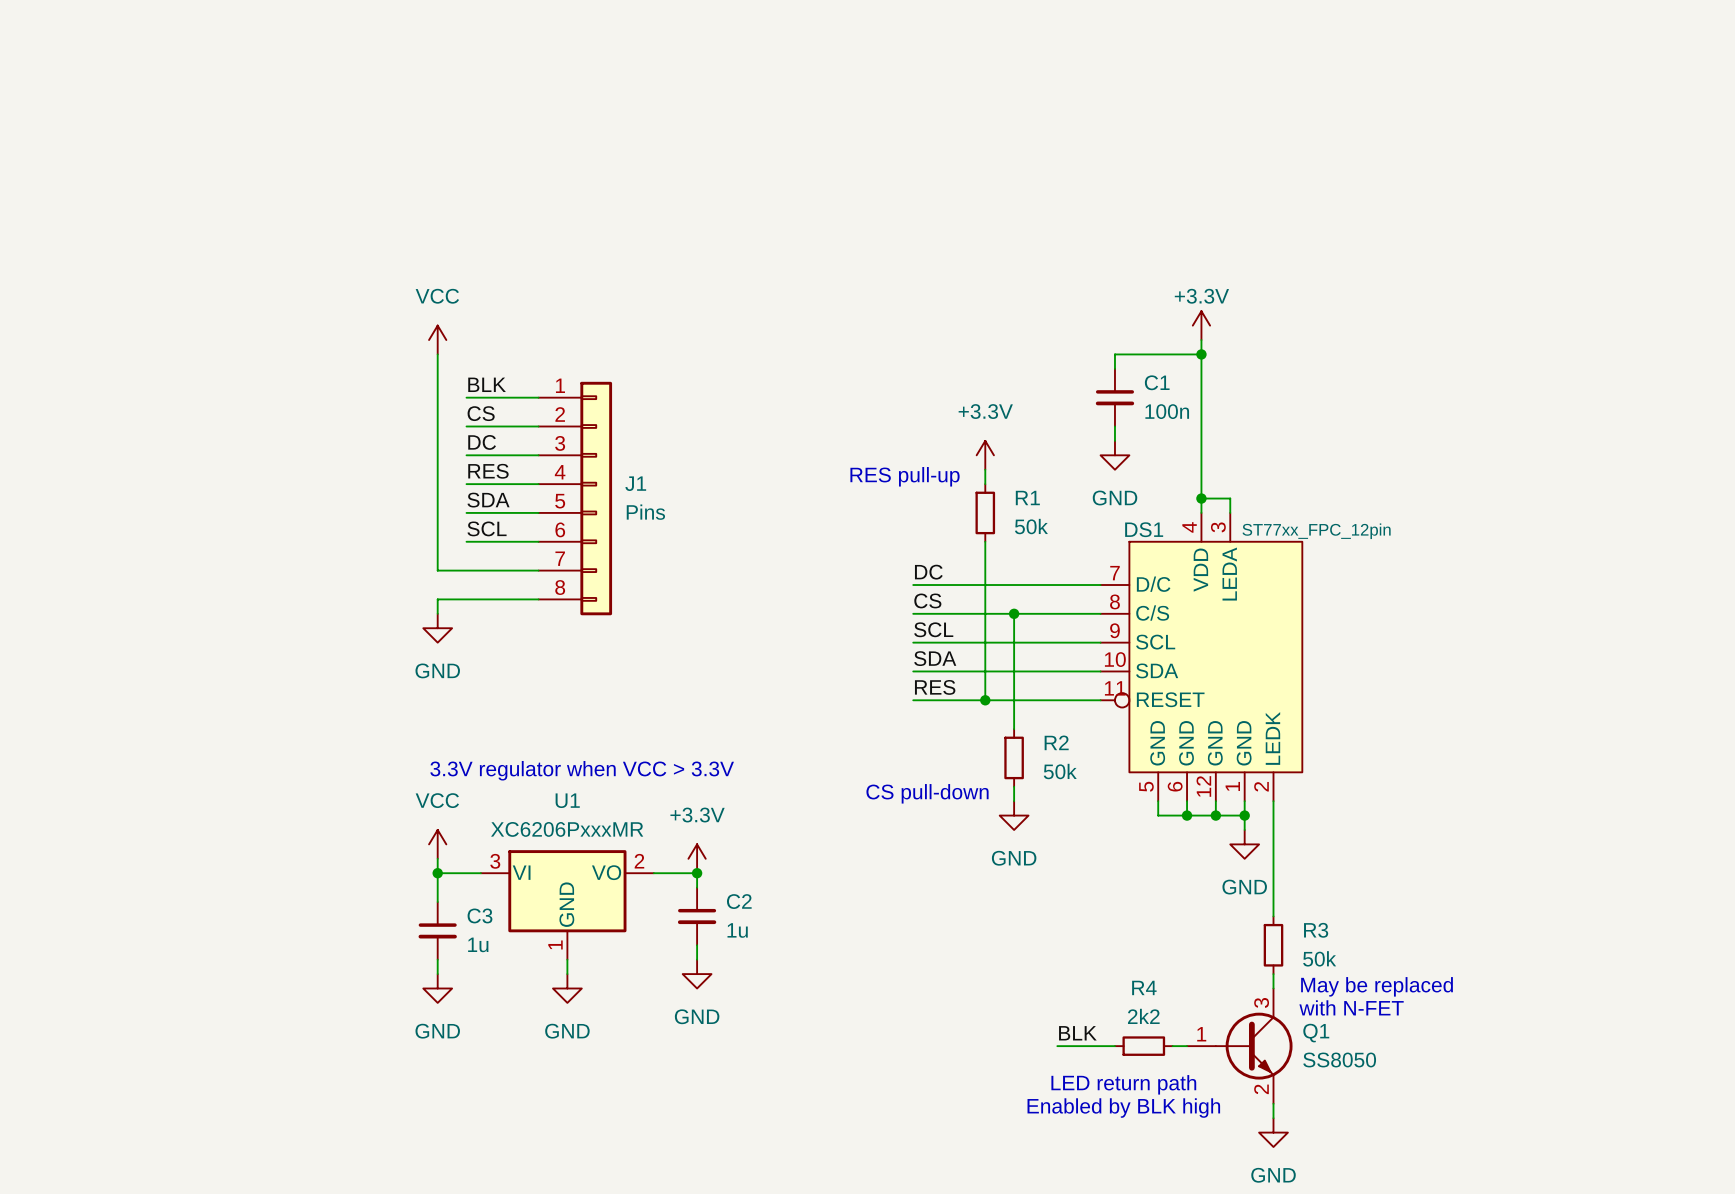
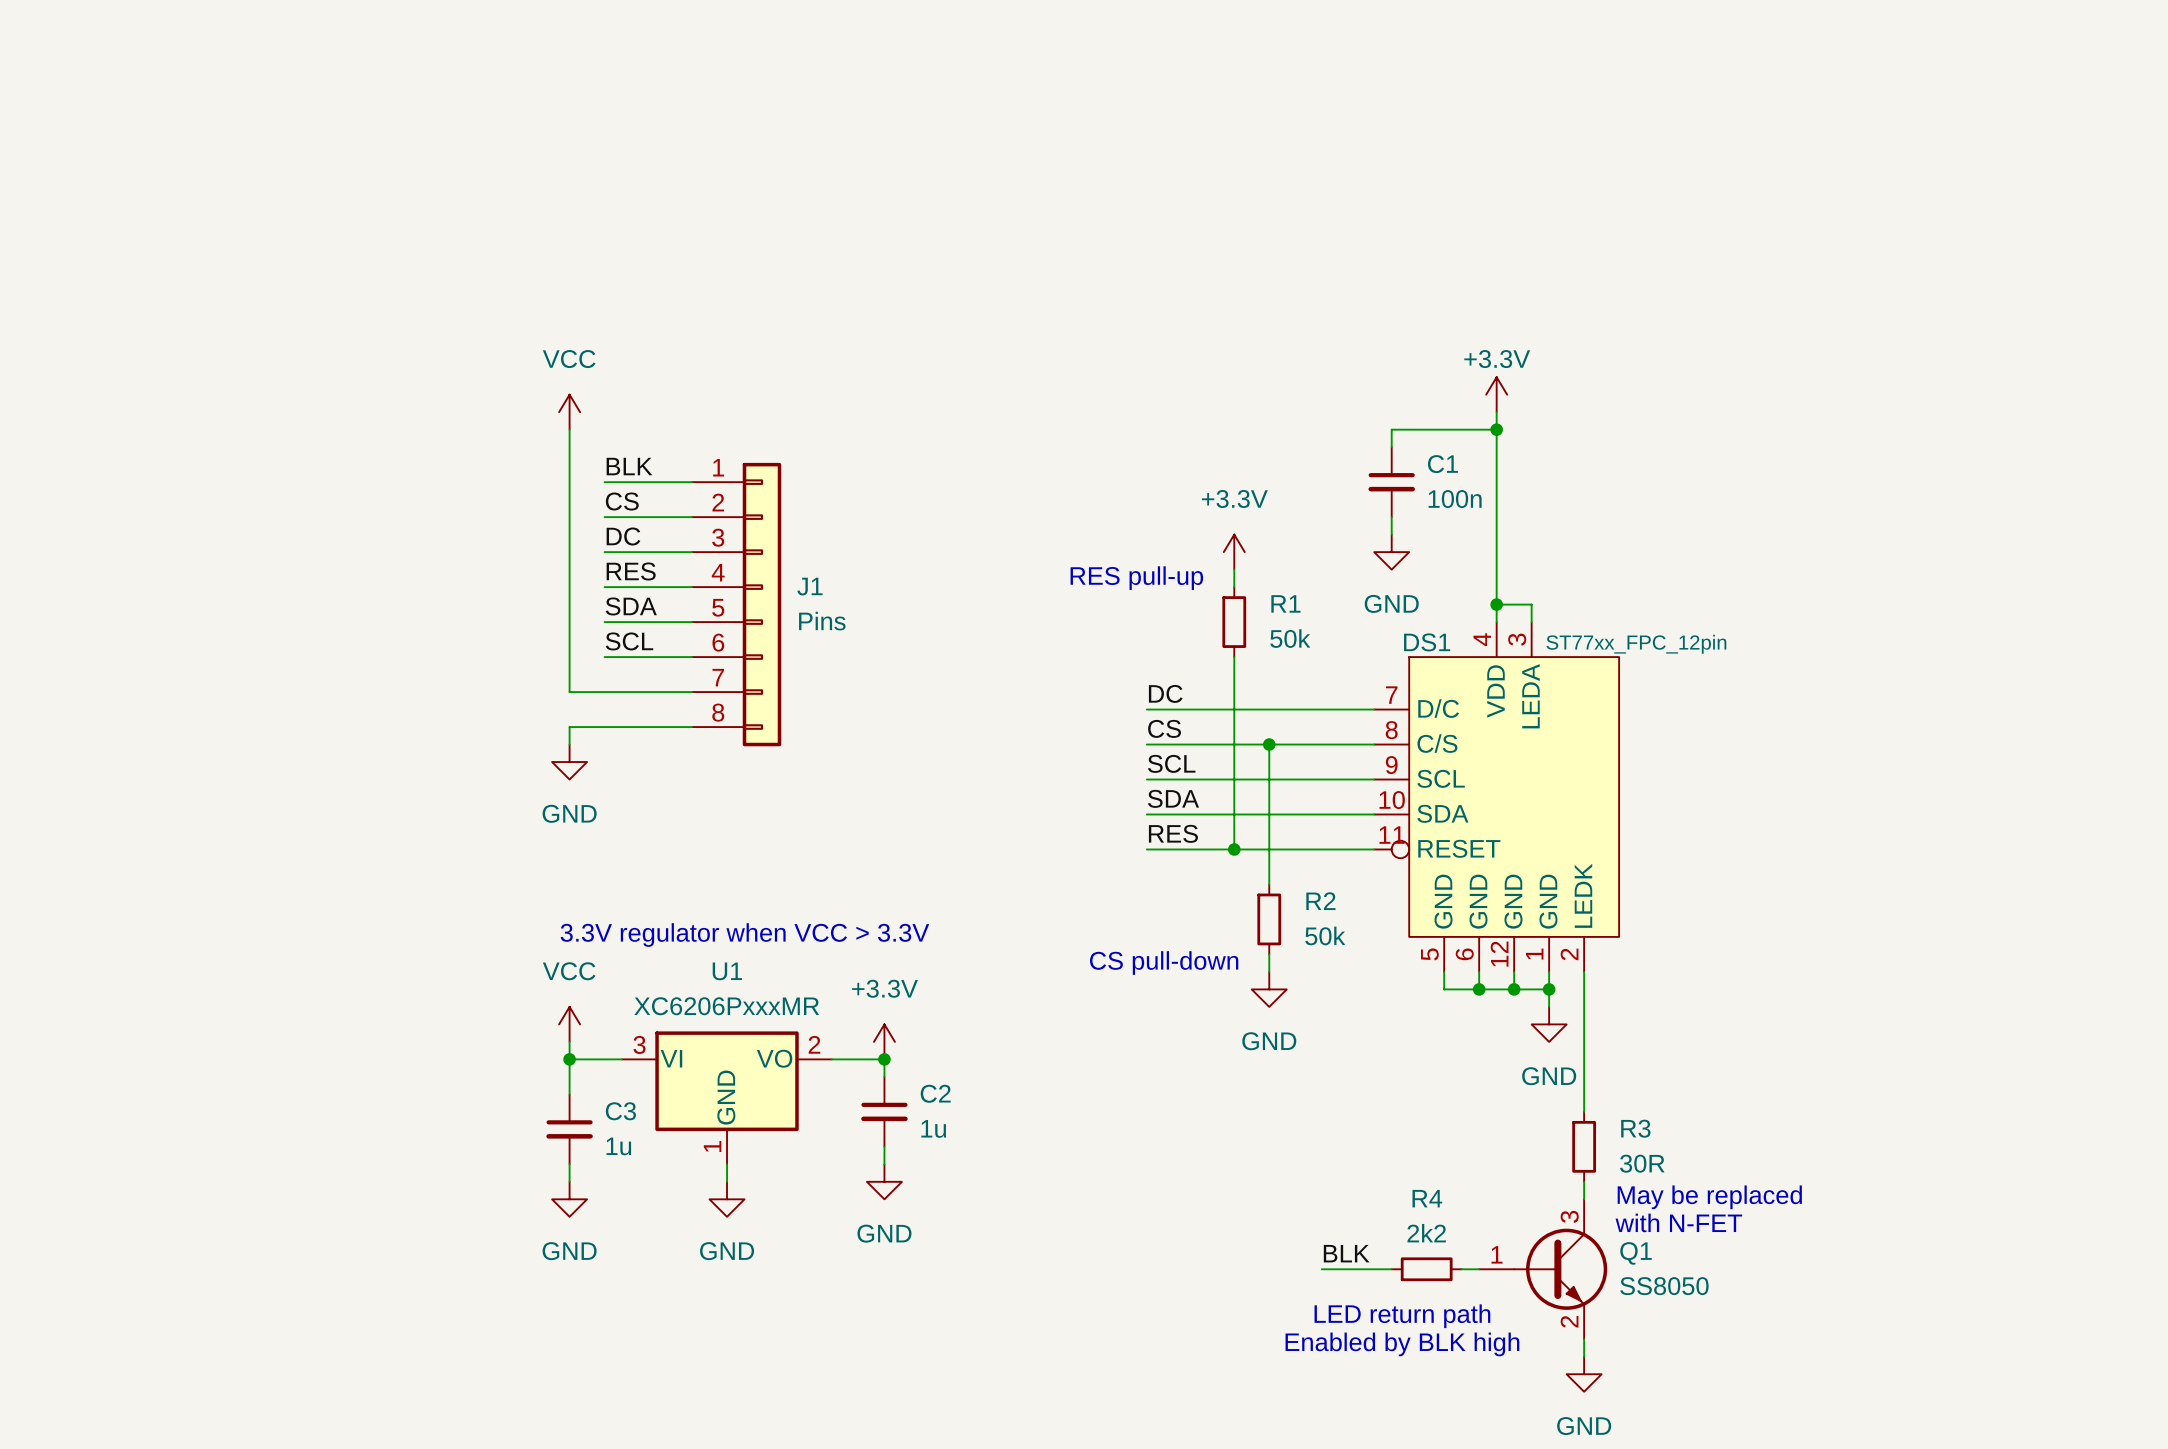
R3 value: 50k (1319, 958) -> 30R (1642, 1163)

